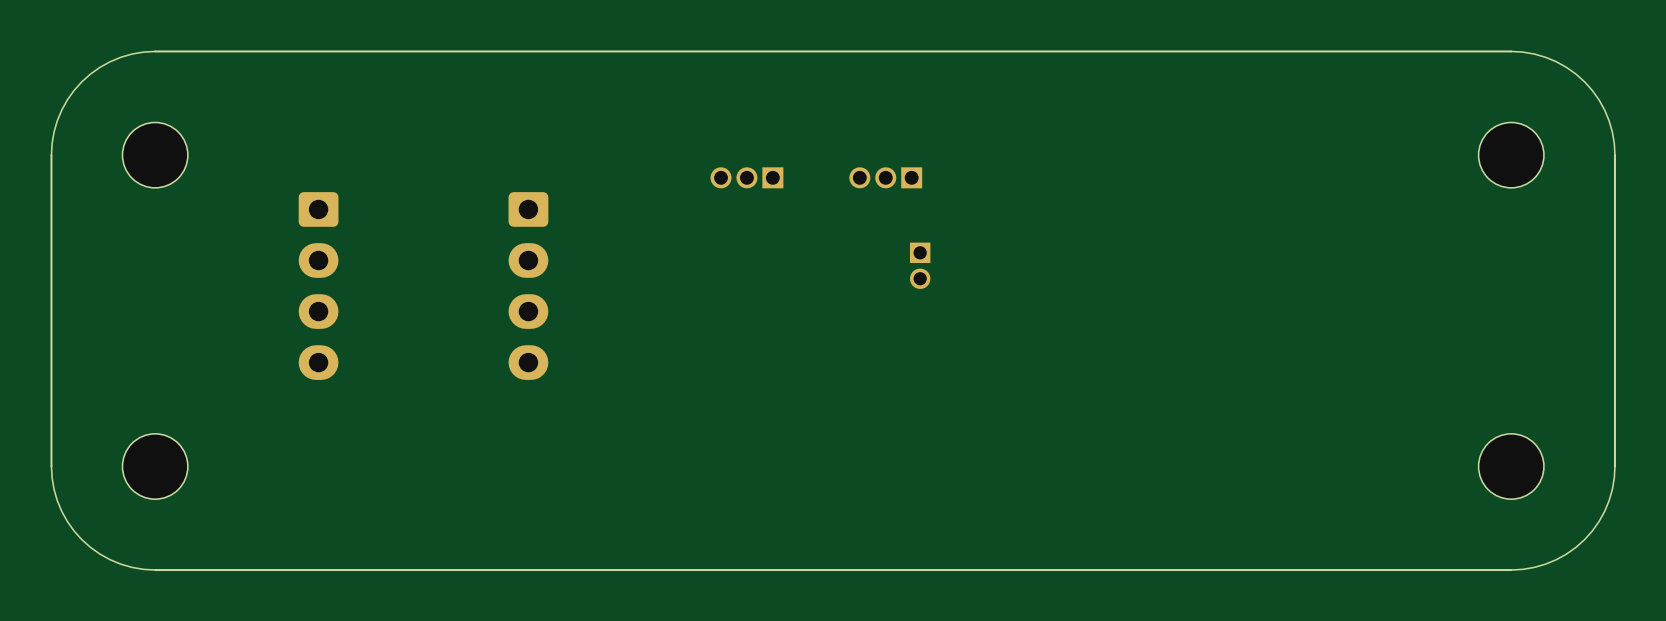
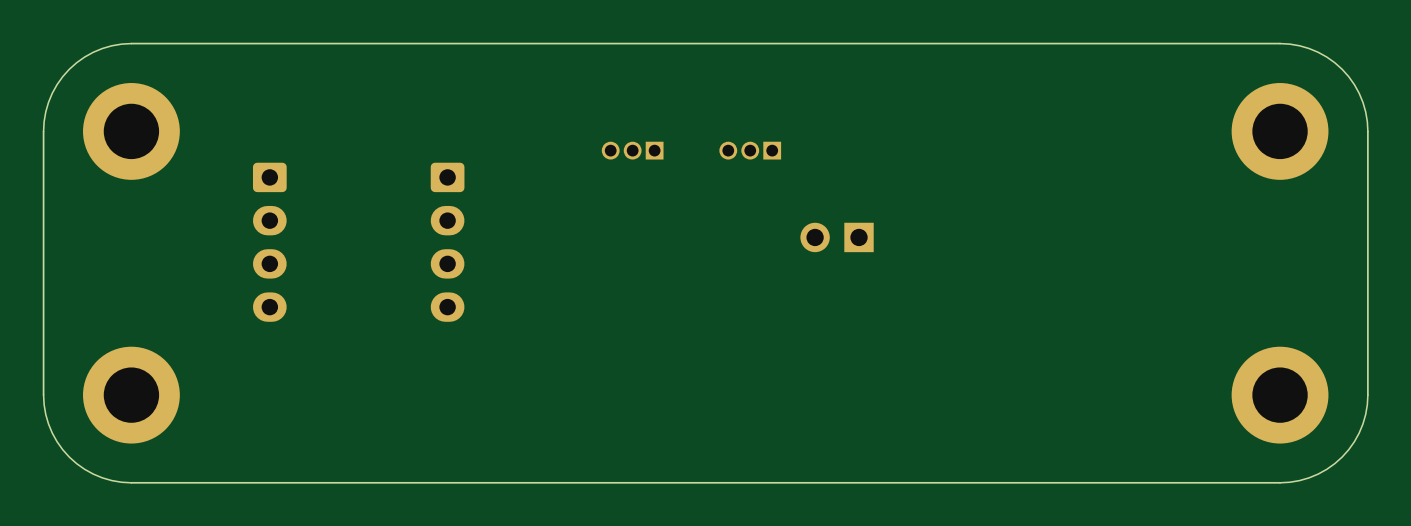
part footprint: [122, 122, 188, 188] -> [83, 83, 180, 180]
part footprint: [1478, 122, 1544, 188] -> [1231, 83, 1329, 180]
part: (920, 265) -> none
part: none -> (837, 237)
part footprint: [122, 433, 188, 500] -> [83, 346, 180, 444]
part footprint: [1478, 433, 1544, 500] -> [1231, 346, 1329, 444]

